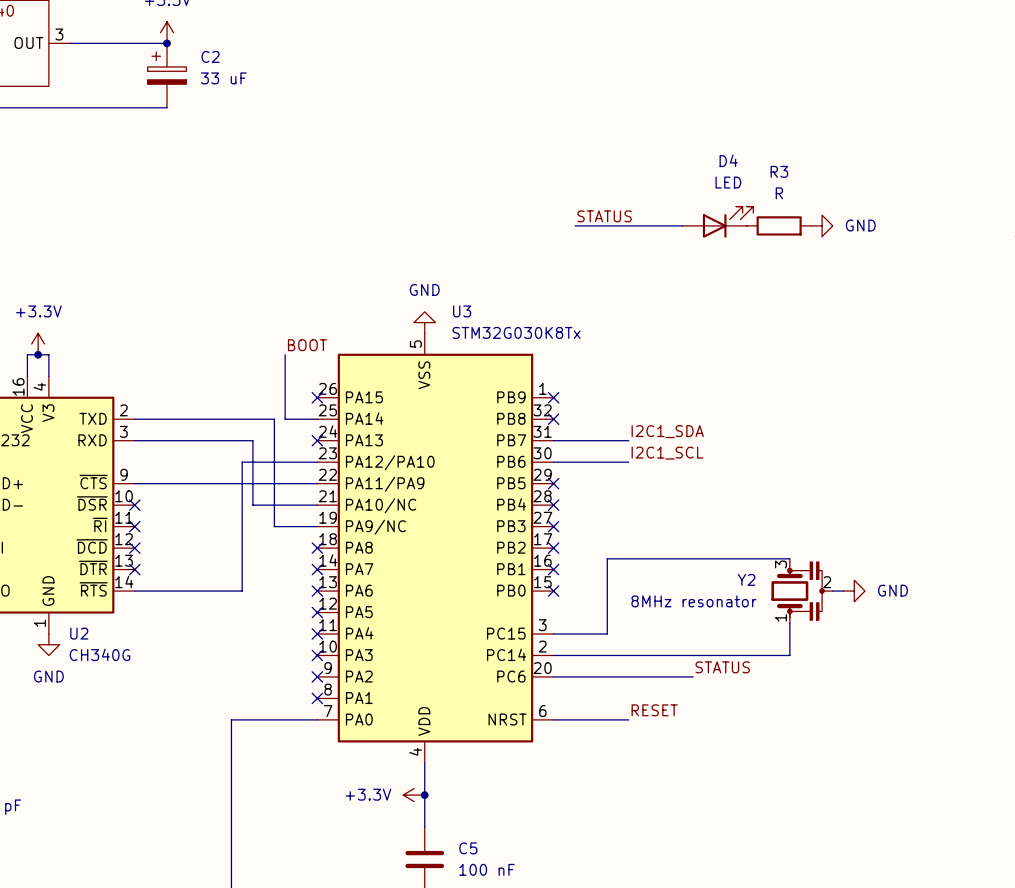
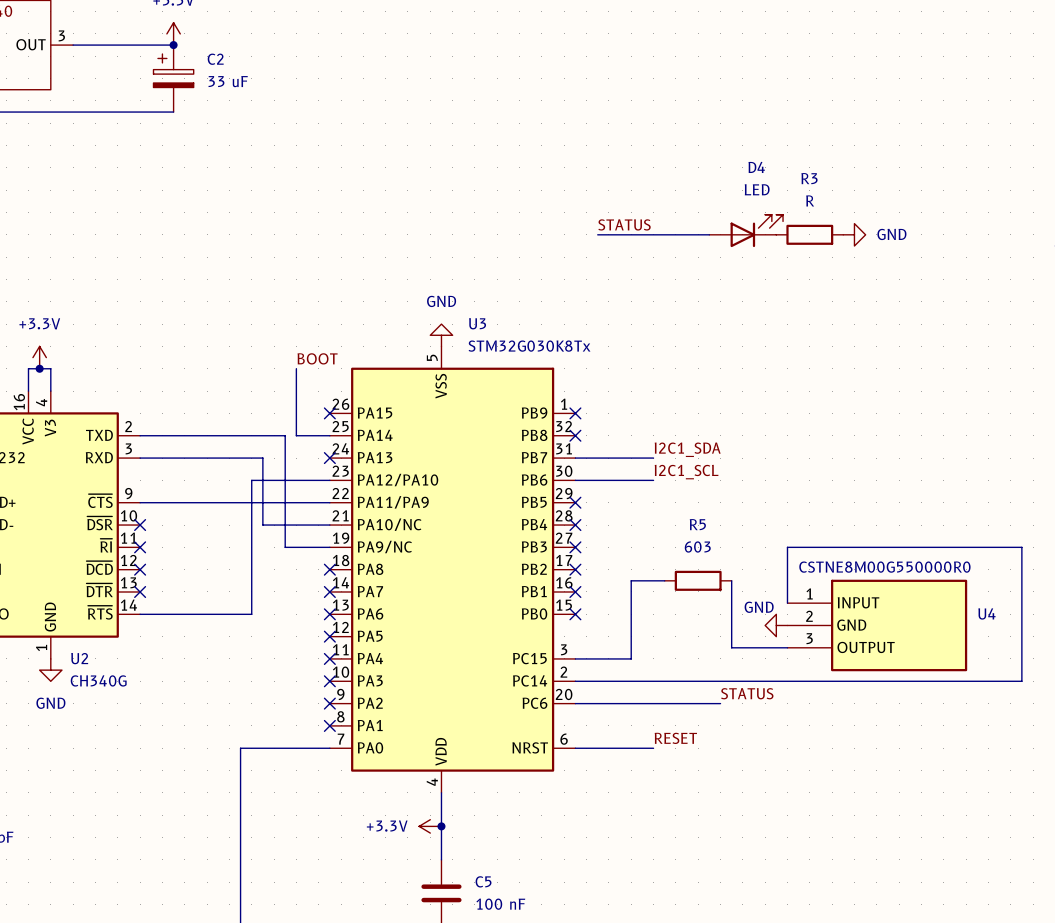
wire: (639, 558) (789, 558) -> none
R5: none -> 603 (698, 580)
wire: none -> (731, 580) (731, 647) (787, 647)
power symbol text position: GND (892, 590) -> GND (759, 607)
Y2: 8MHz resonator (802, 591) -> none
power symbol rotation: 0° (854, 591) -> 180° (776, 625)
power symbol position: GND (854, 591) -> GND (776, 625)
U4: none -> CSTNE8M00G550000R0 (877, 625)
wire: (789, 623) (789, 655) -> (787, 603) (787, 547) (1021, 547) (1021, 681) (820, 681)

